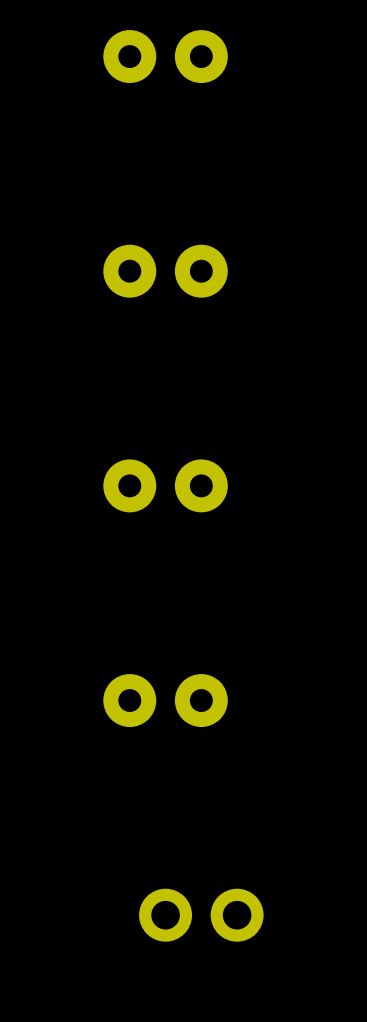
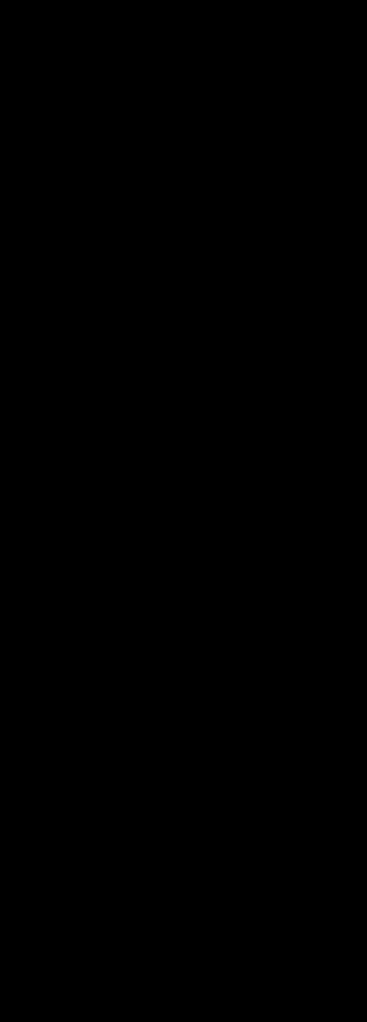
part: (165, 56) -> none
part: (165, 271) -> none
part: (165, 485) -> none
part: (165, 700) -> none
part: (201, 915) -> none

